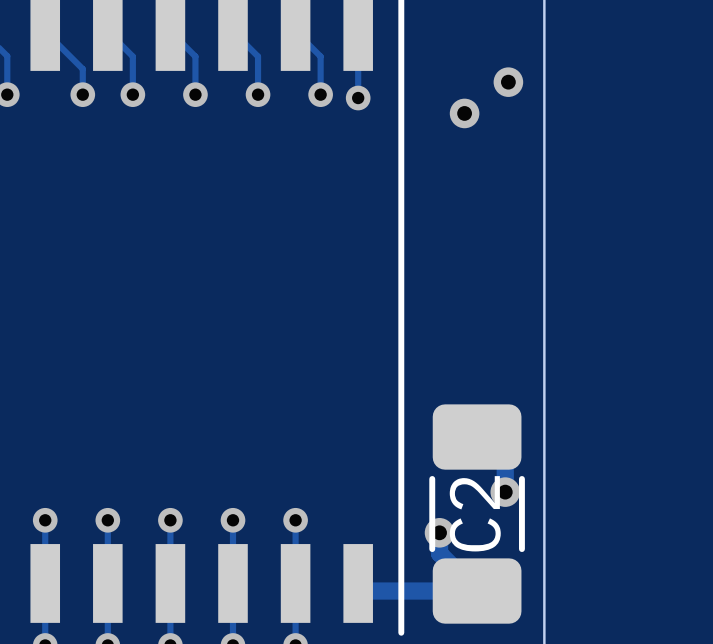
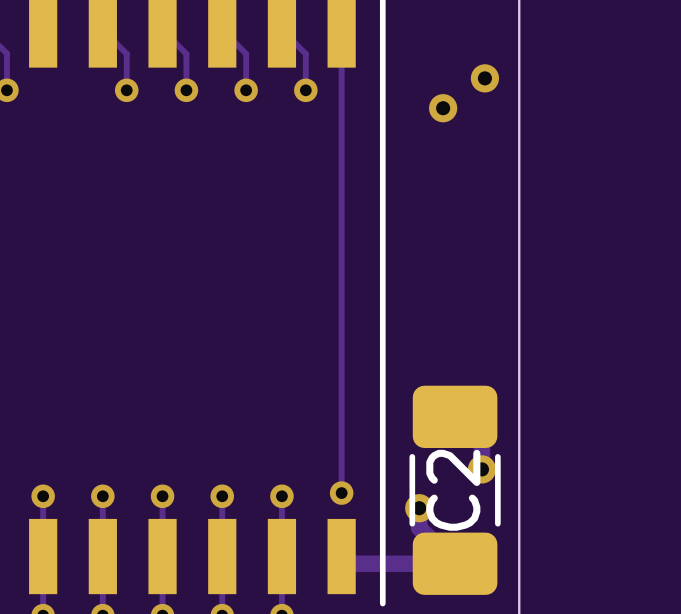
track: (45, 31) (82, 69) (82, 94) -> none
via: (82, 94) -> none
track: none -> (341, 93) (341, 493)
via: (358, 98) -> none
via: none -> (341, 493)

